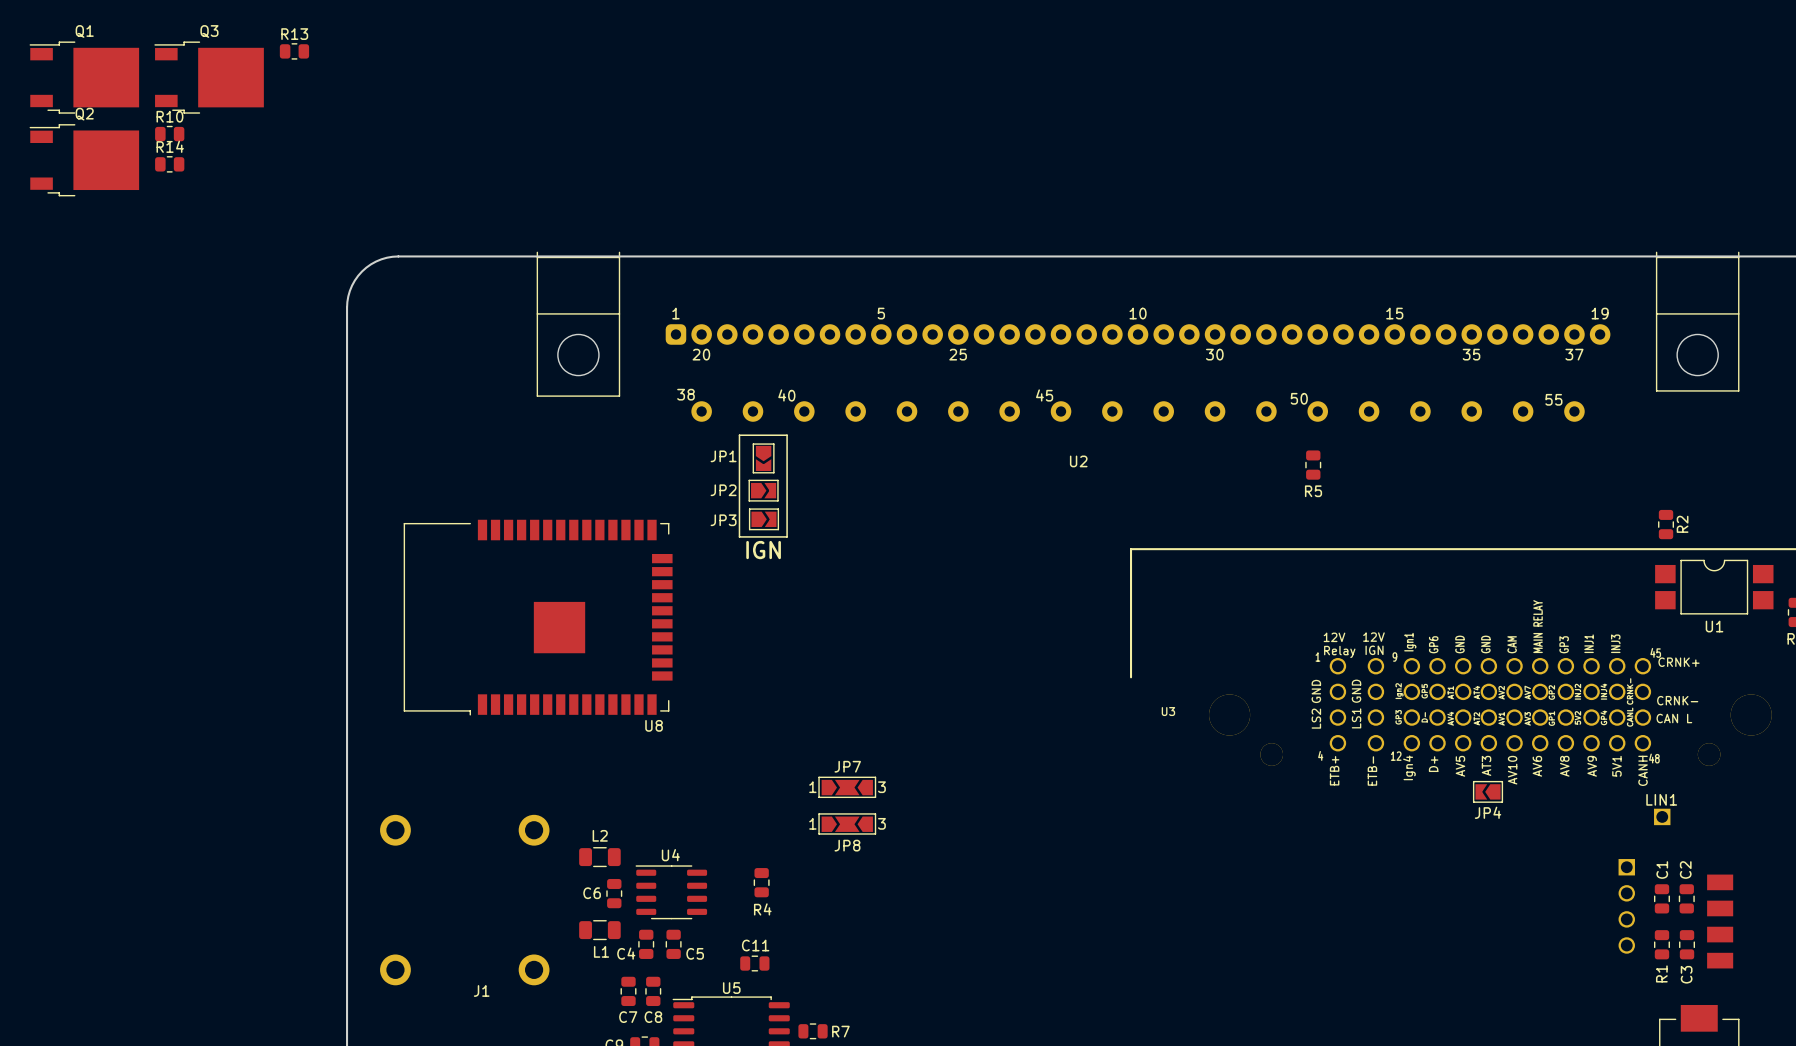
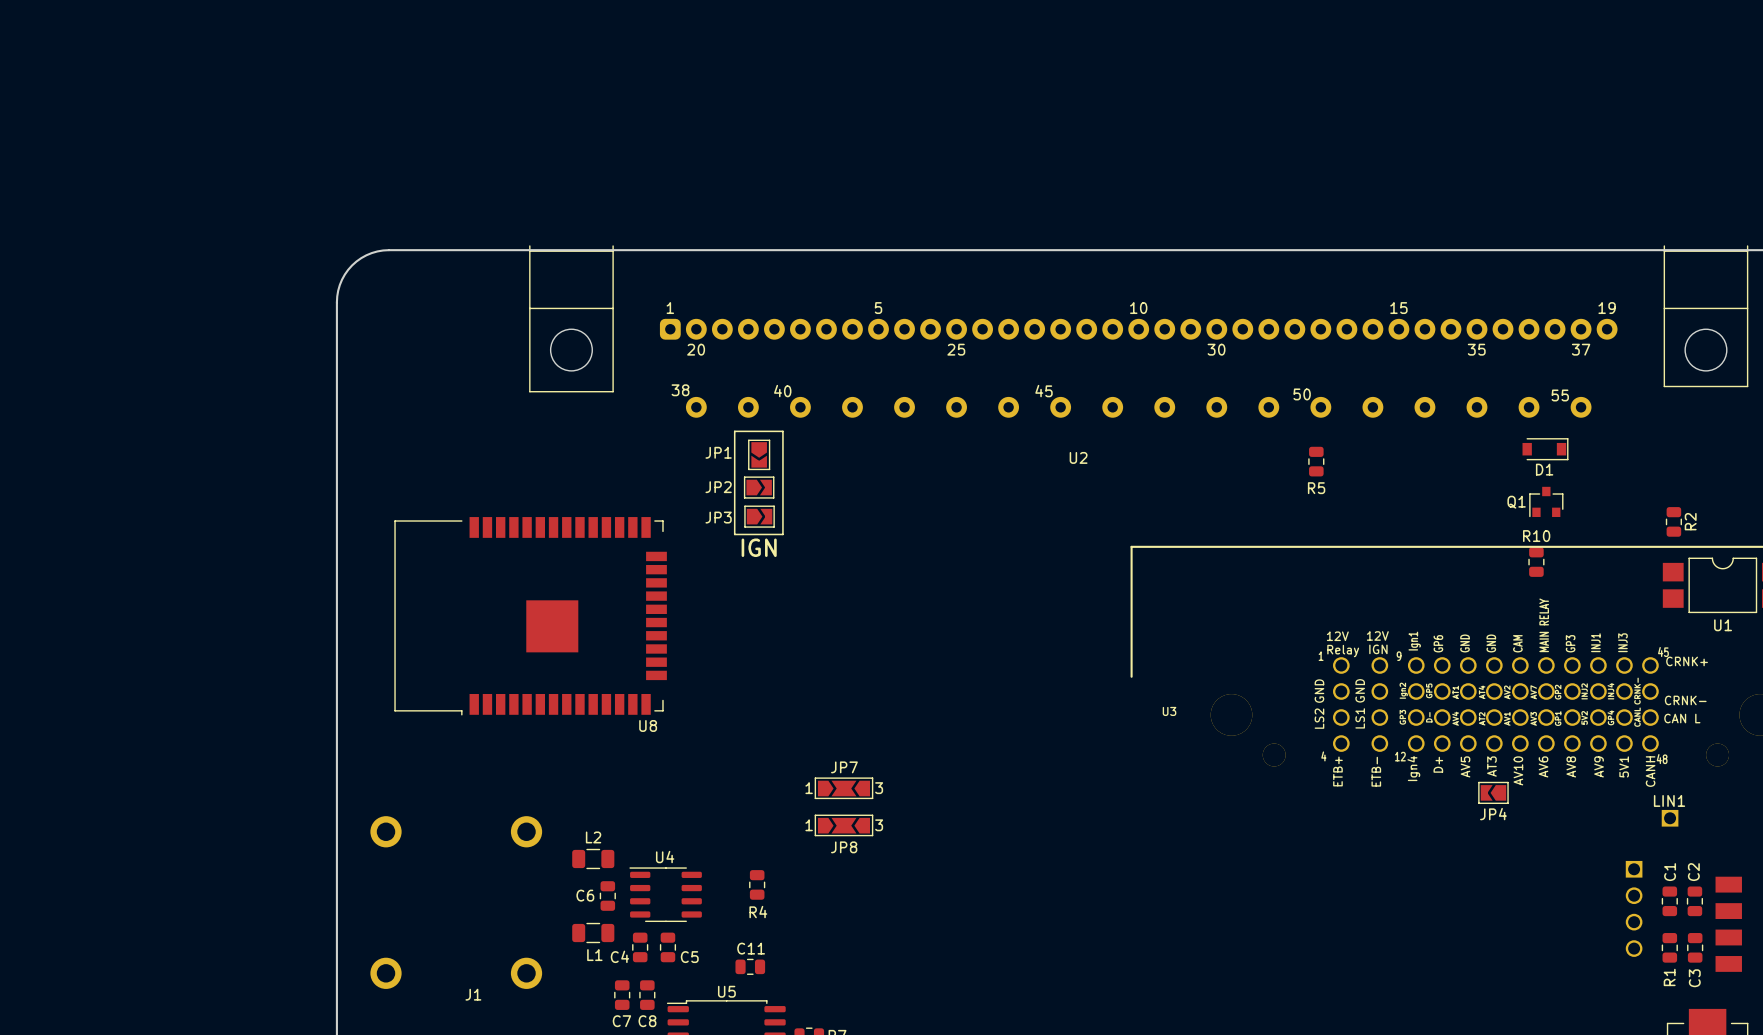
Q1 name position: Q1 (84, 31) -> Q1 (1516, 502)
Q1 footprint: [29, 41, 140, 114] -> [1529, 486, 1564, 518]
R13: (294, 51) -> none
Q3: (209, 77) -> none
R10 footprint: [155, 125, 185, 143] -> [1528, 547, 1545, 577]
Q2: (84, 160) -> none
R14: (169, 164) -> none
D1: none -> (1545, 449)

